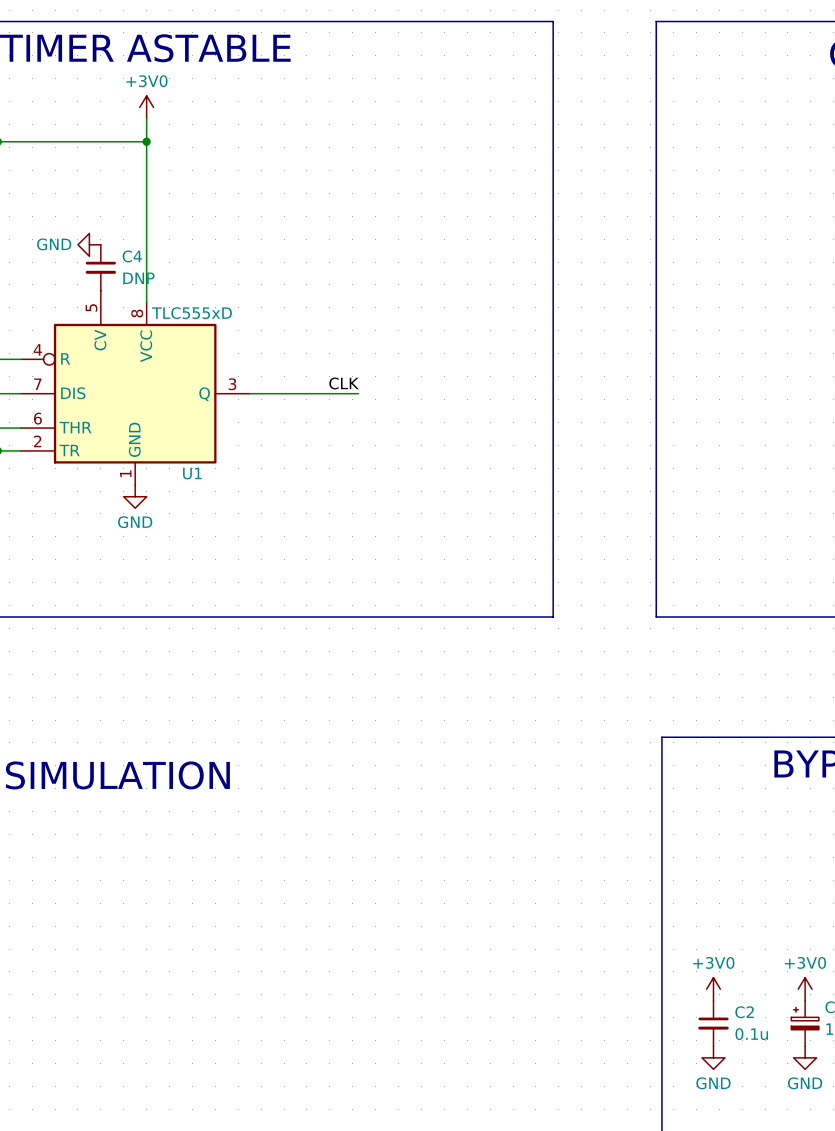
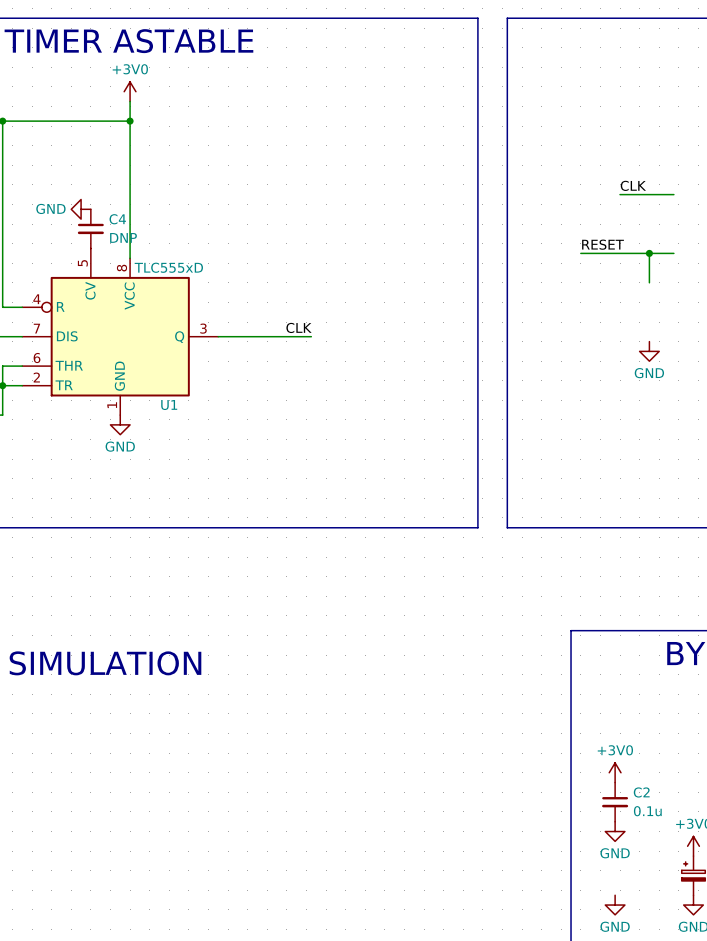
line: (656, 21) (656, 617) -> (566, 18) (507, 18) (507, 527) (566, 527)
label: none -> CLK (633, 185)
wire: none -> (620, 194) (673, 194)
label: none -> RESET (603, 244)
wire: none -> (580, 253) (673, 253)
wire: none -> (649, 253) (649, 282)
junction: none -> (649, 253)
power symbol: none -> GND (649, 351)
power symbol: none -> GND (615, 831)
power symbol position: +3V0 (713, 989) -> +3V0 (615, 772)
C2 position: (713, 1023) -> (615, 802)

